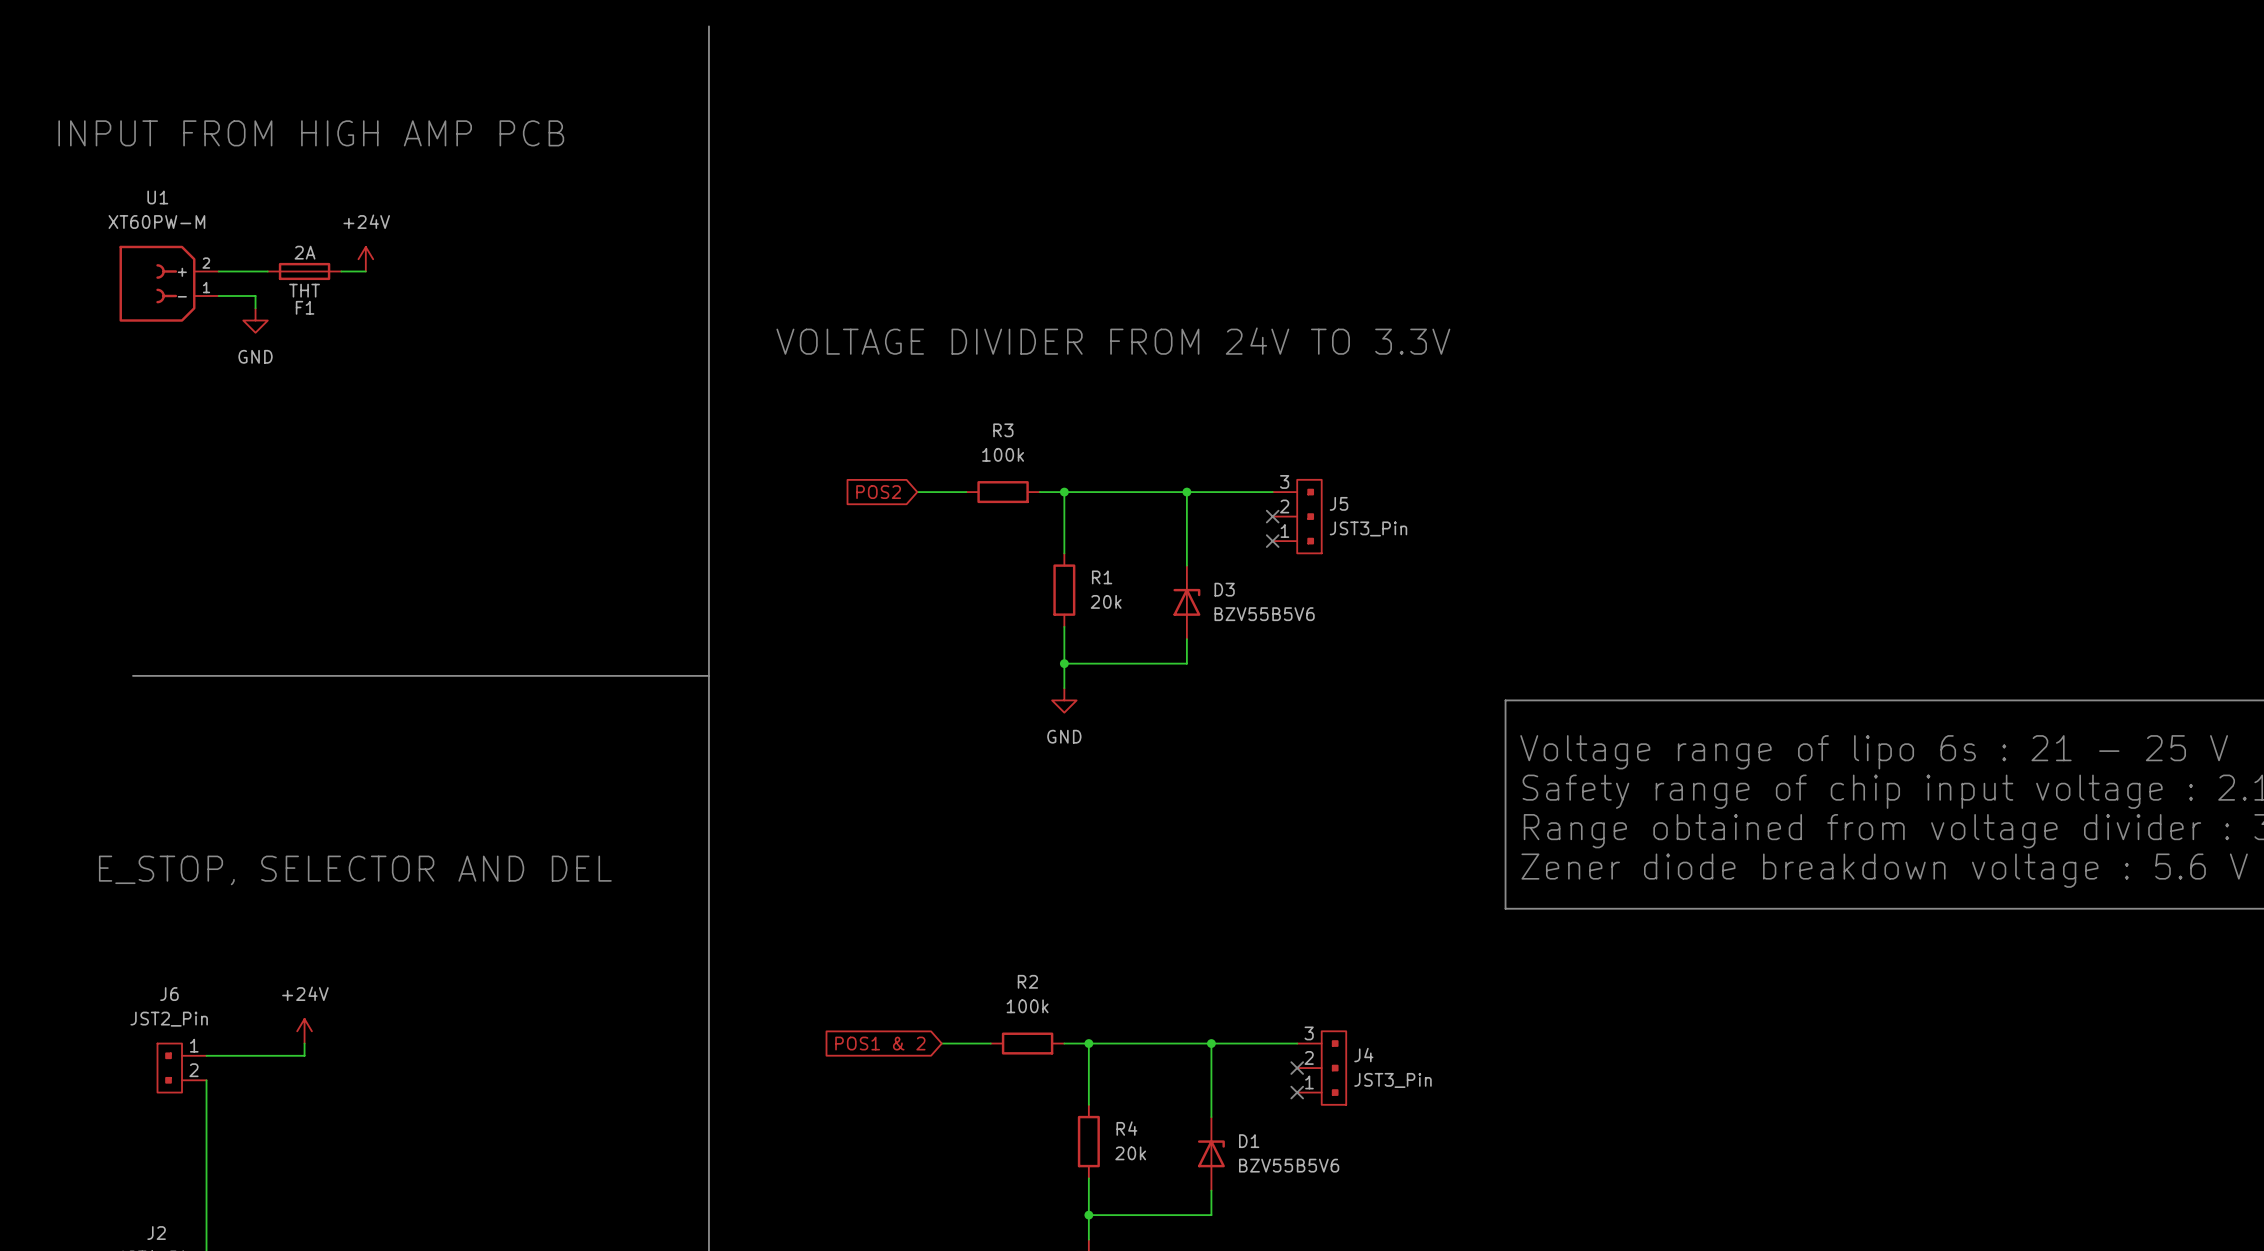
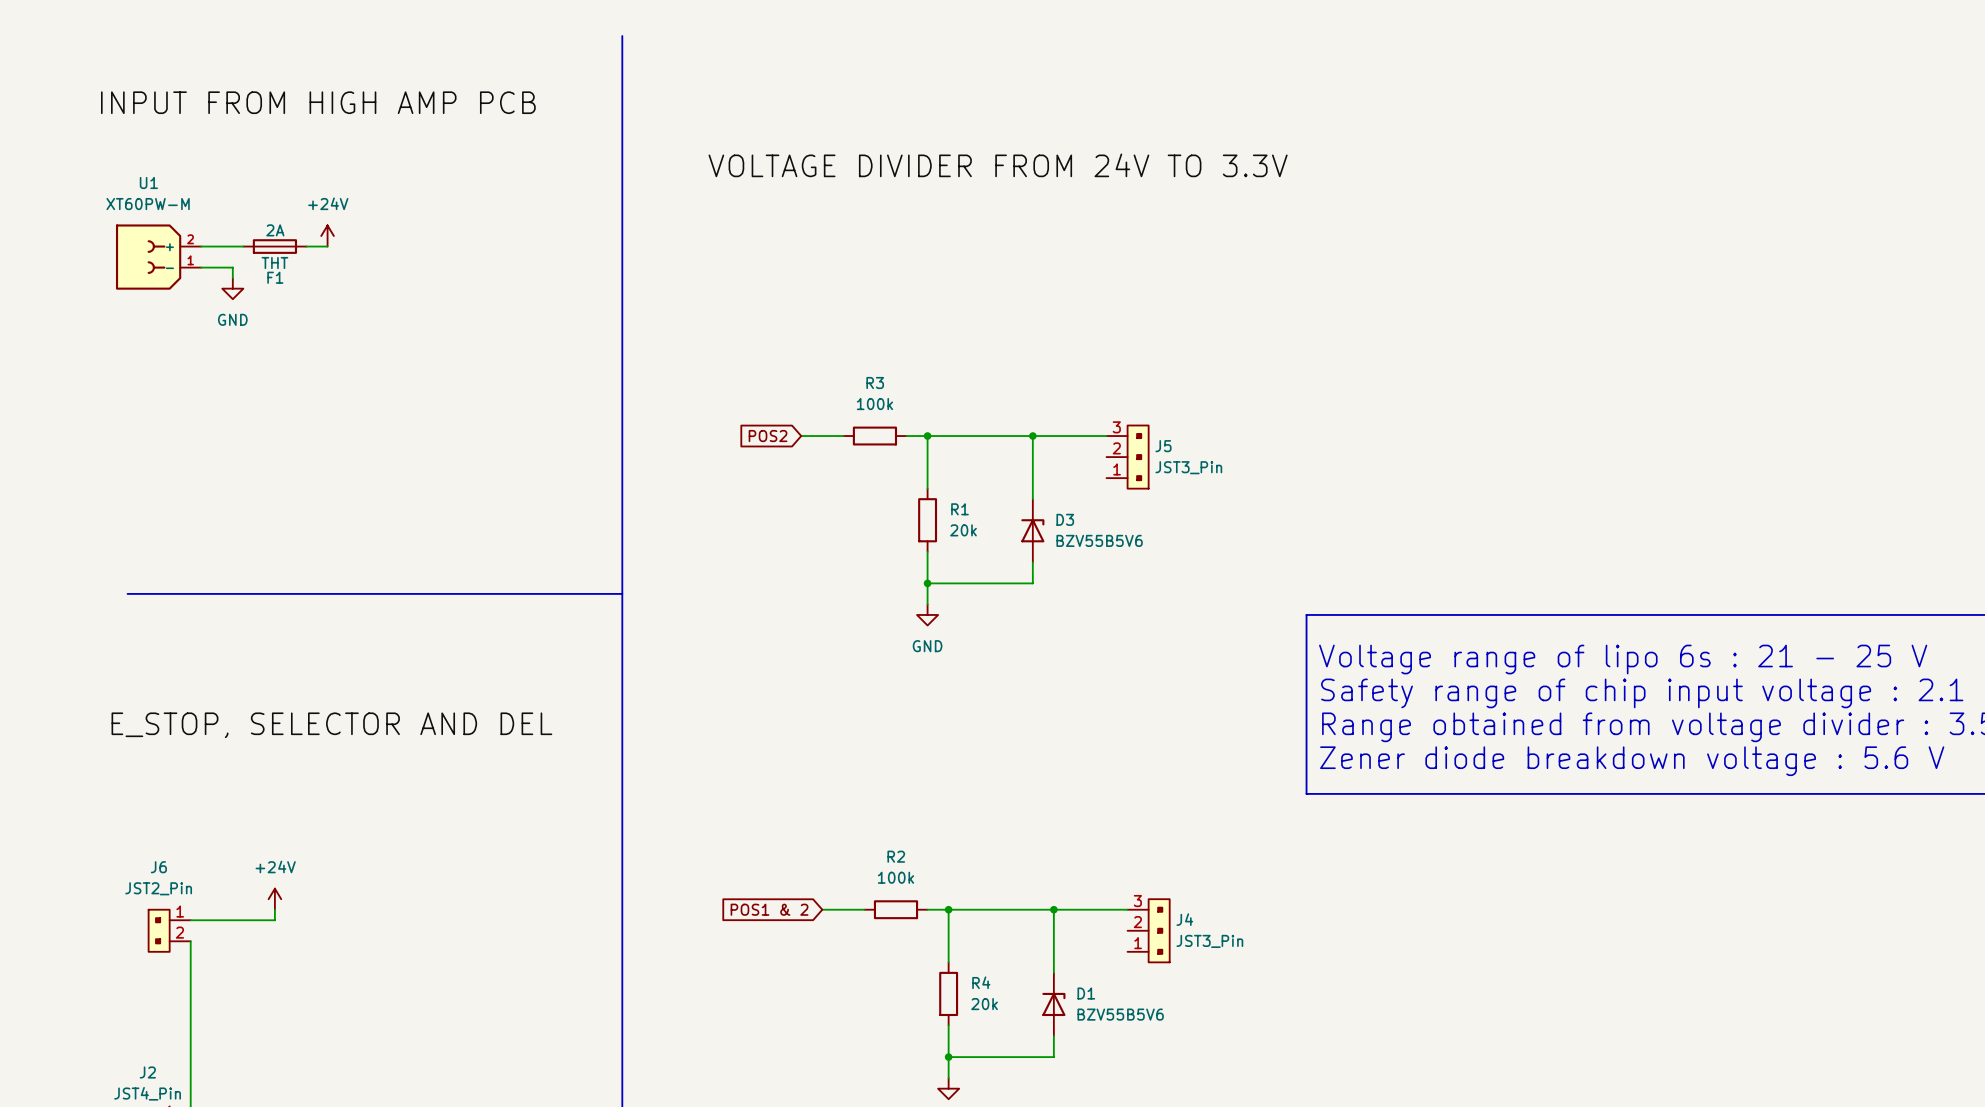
label: none -> INPUT FROM HIGH AMP PCB (318, 102)
text: INPUT FROM HIGH AMP PCB (311, 133) -> none
label: none -> VOLTAGE DIVIDER FROM 24V TO 3.3V (998, 165)
text: VOLTAGE DIVIDER FROM 24V TO 3.3V (1113, 341) -> none
no-connect mark: (1272, 516) -> none
no-connect mark: (1272, 541) -> none
label: none -> E_STOP, SELECTOR AND DEL (331, 725)
text: E_STOP, SELECTOR AND DEL (355, 870) -> none
no-connect mark: (1297, 1068) -> none
no-connect mark: (1297, 1092) -> none

